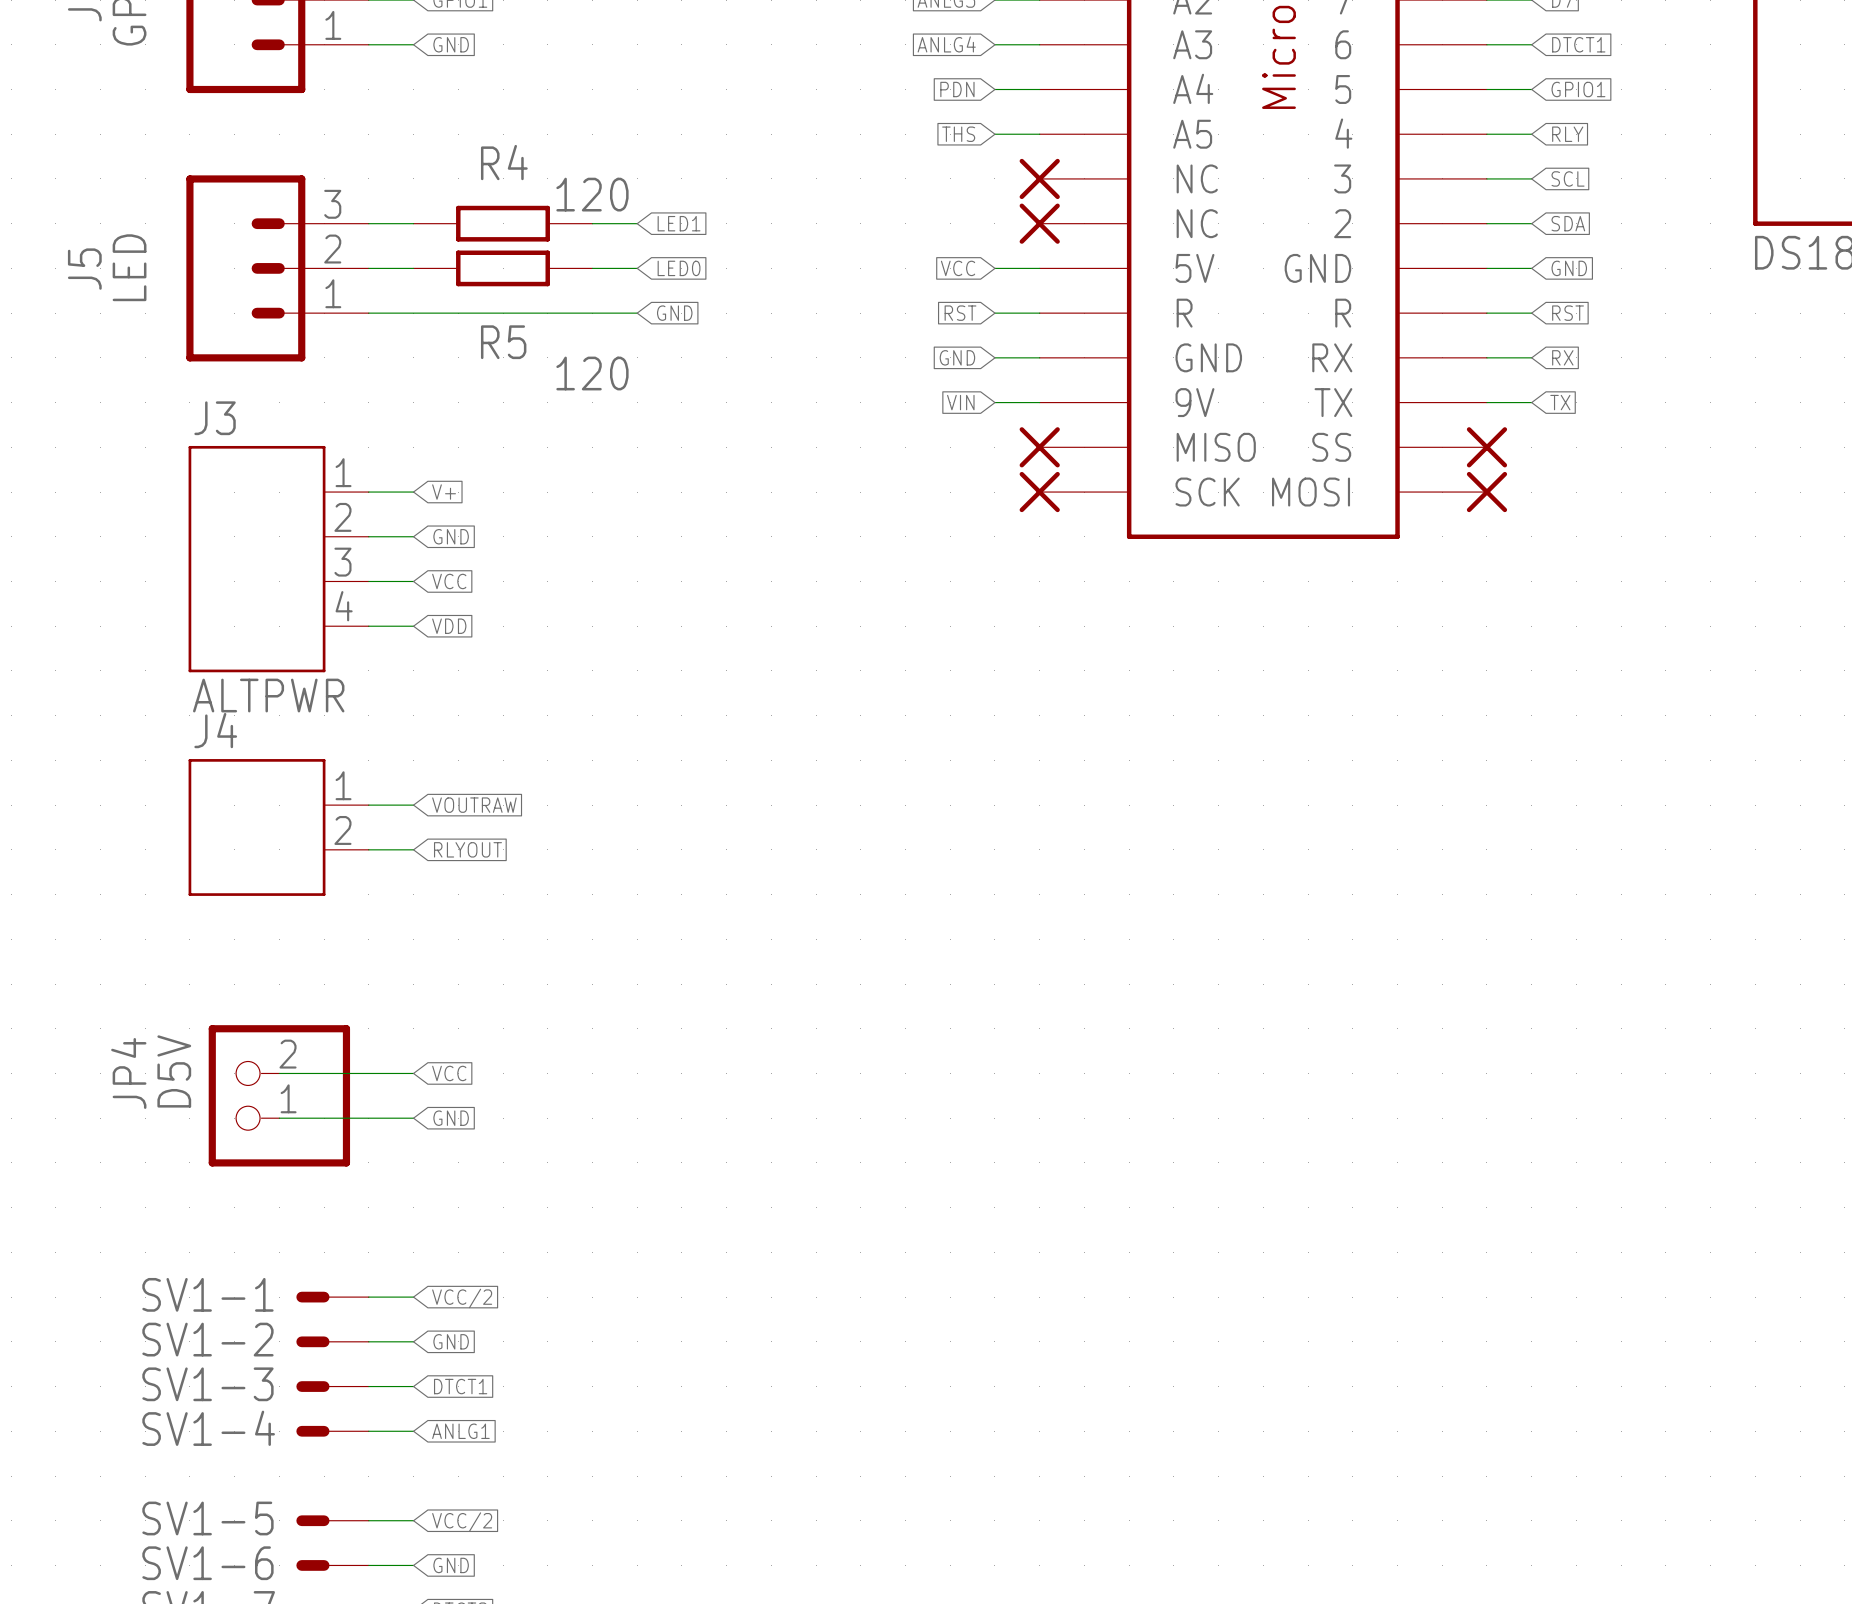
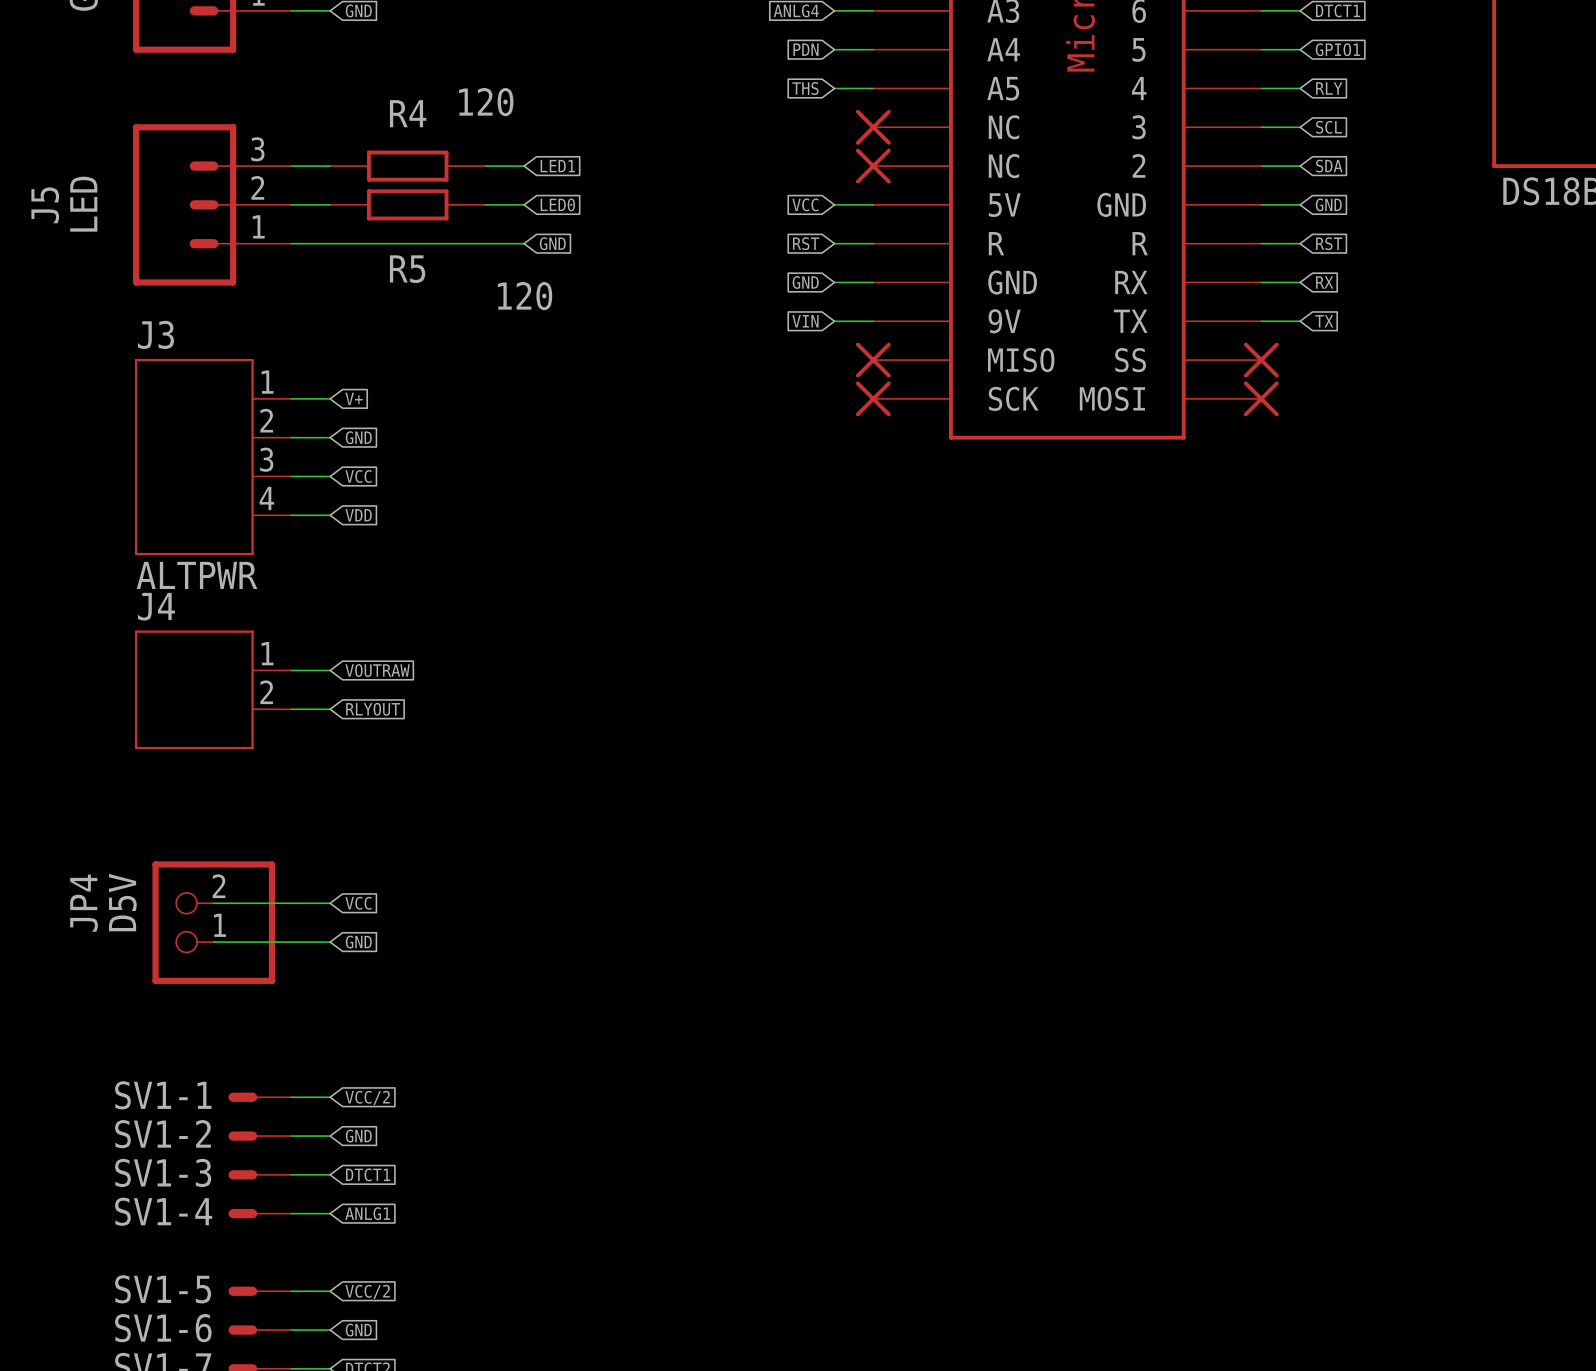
R4 value position: 120 (592, 194) -> 120 (486, 102)
R5 value position: 120 (592, 373) -> 120 (525, 296)

